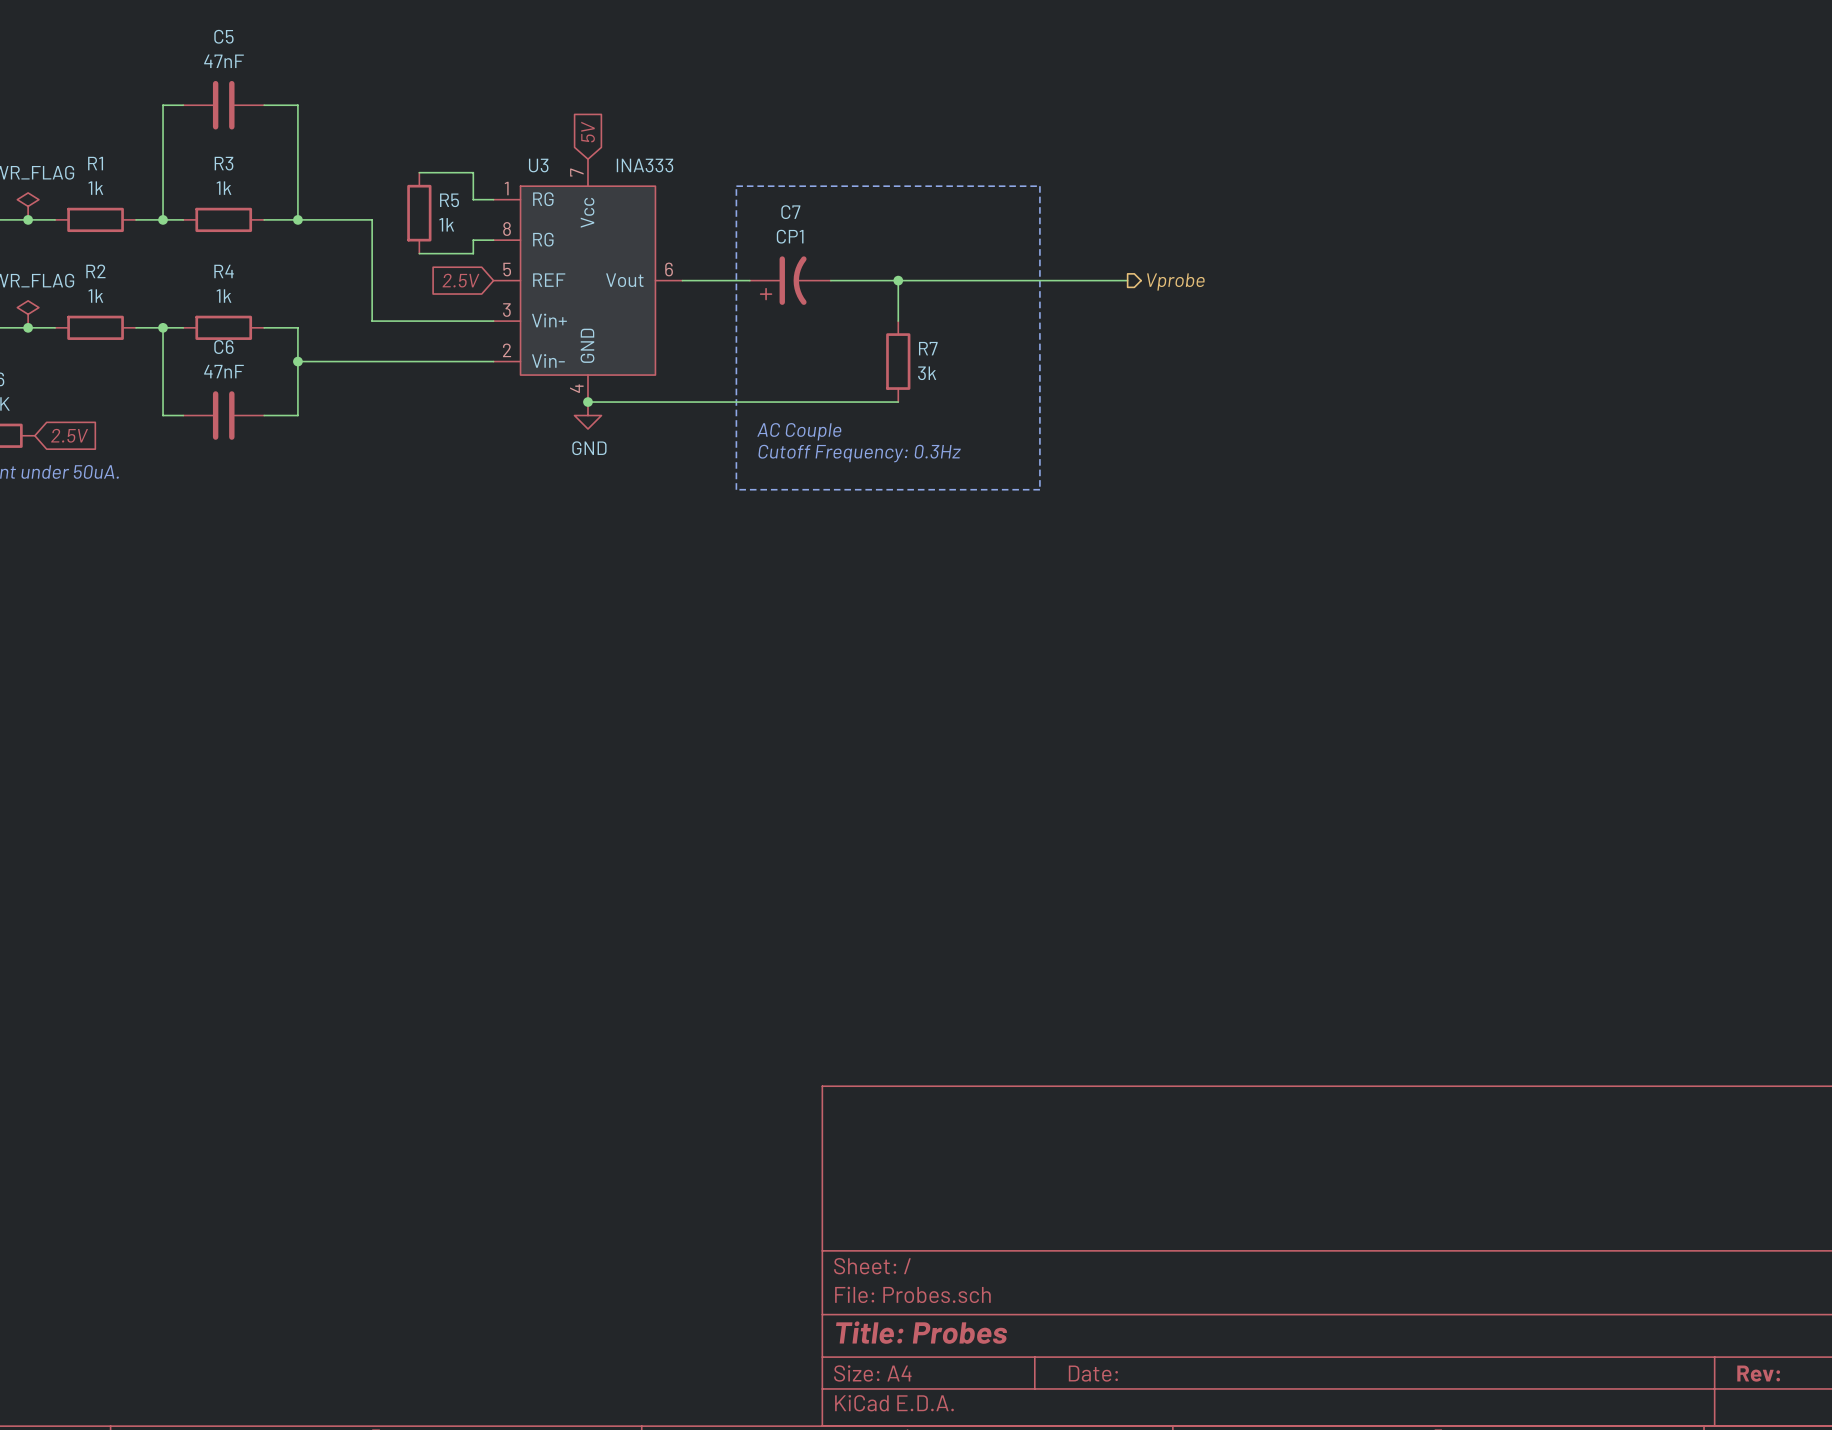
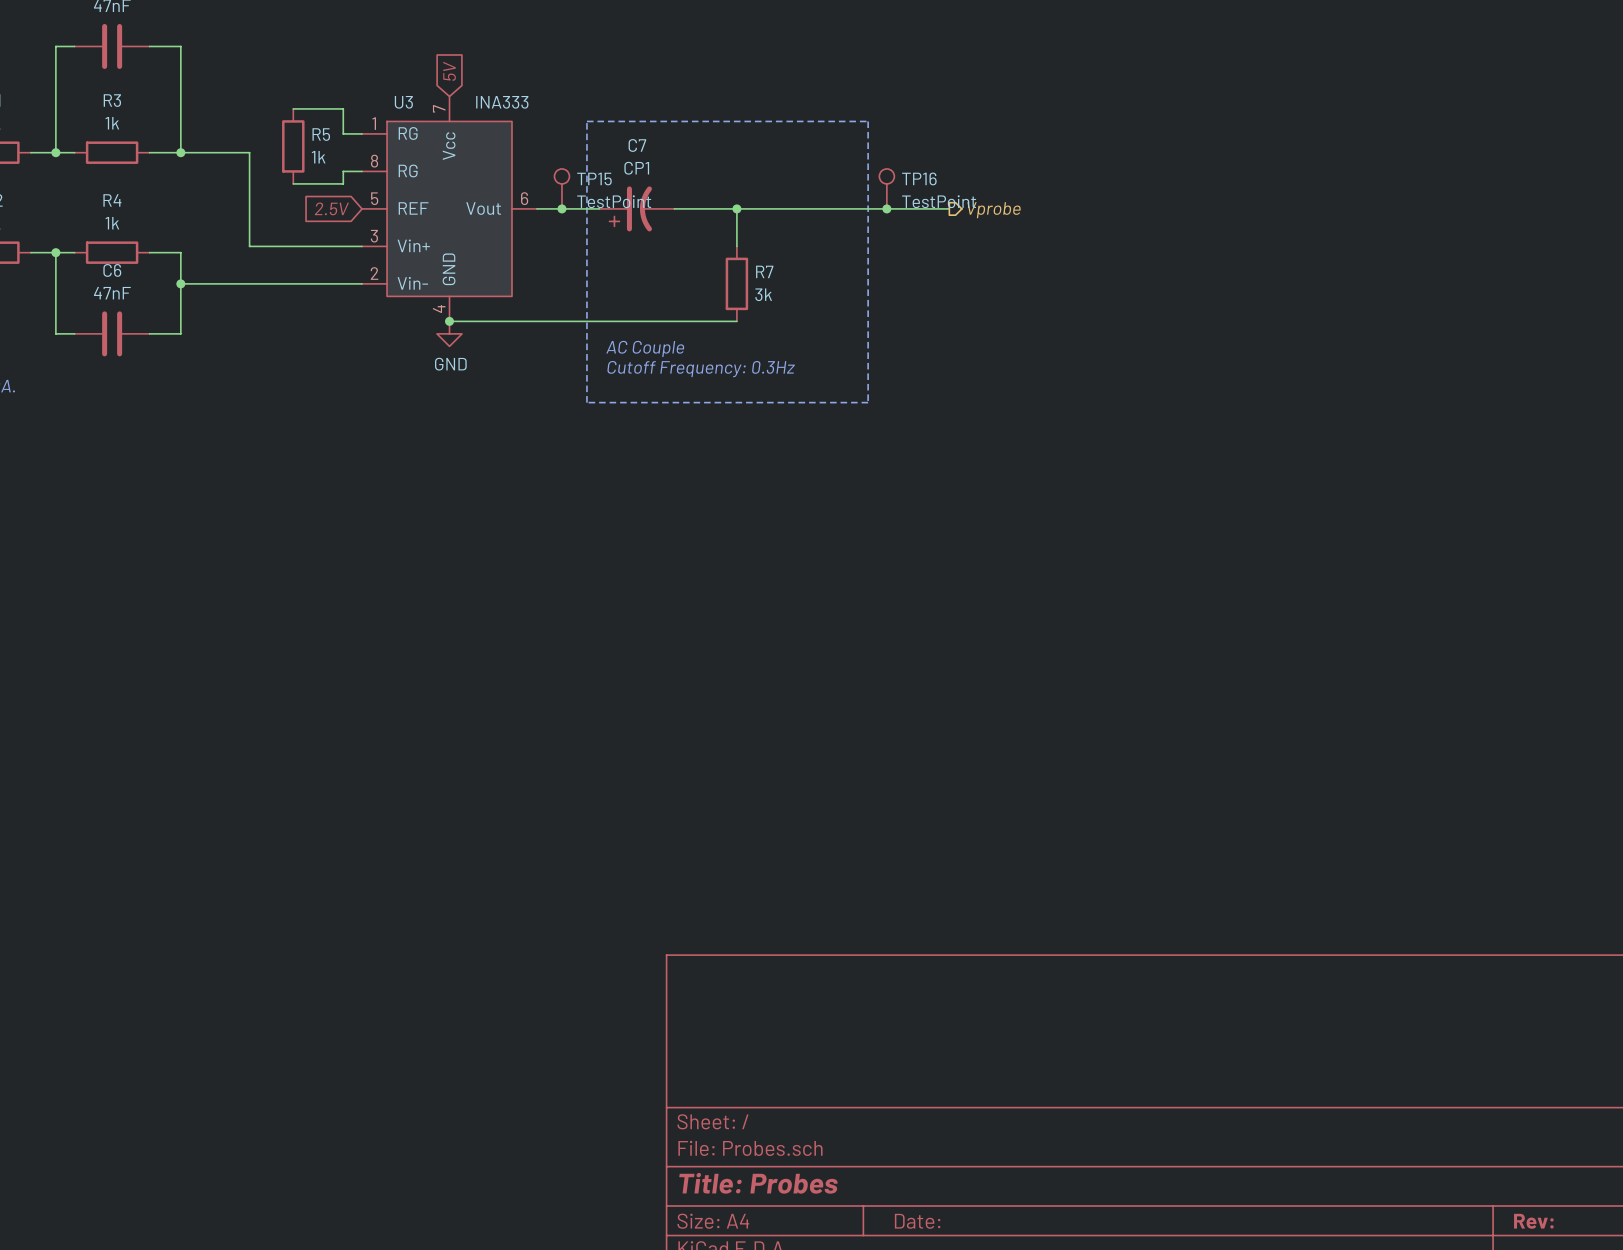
TP15: none -> TestPoint (561, 188)
TP16: none -> TestPoint (886, 188)
junction: none -> (561, 208)
junction: none -> (886, 208)

